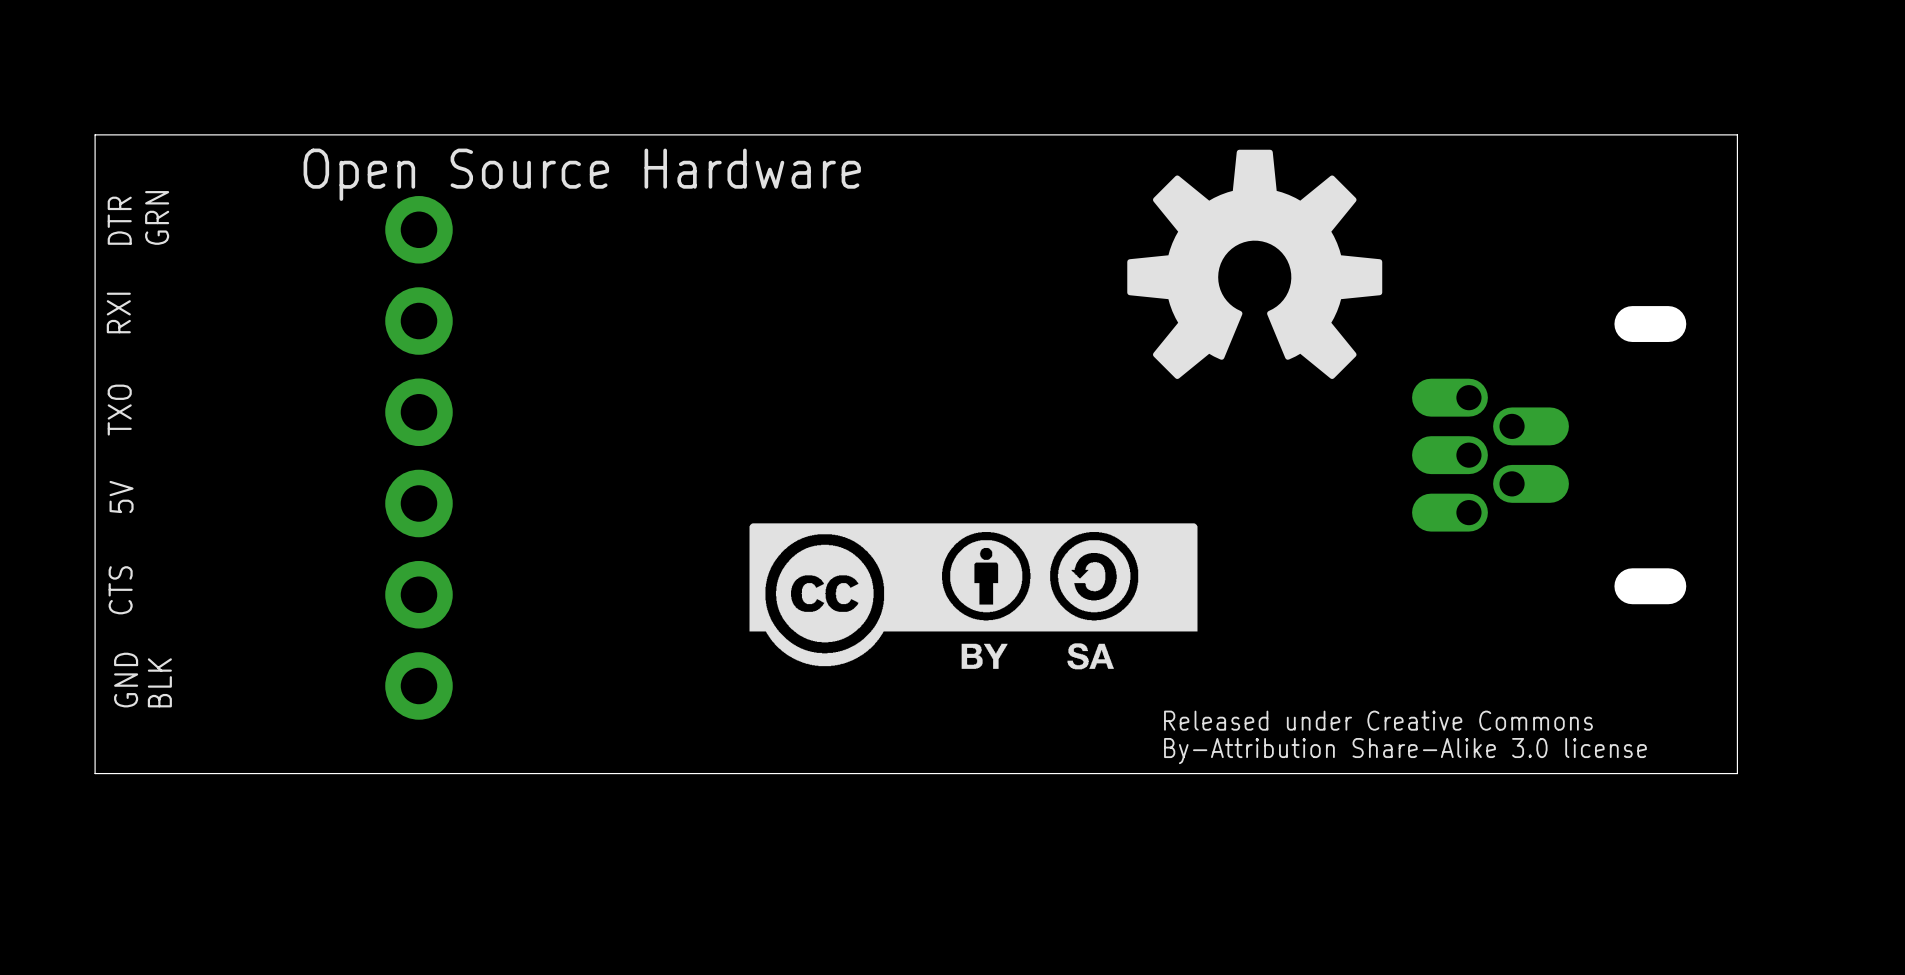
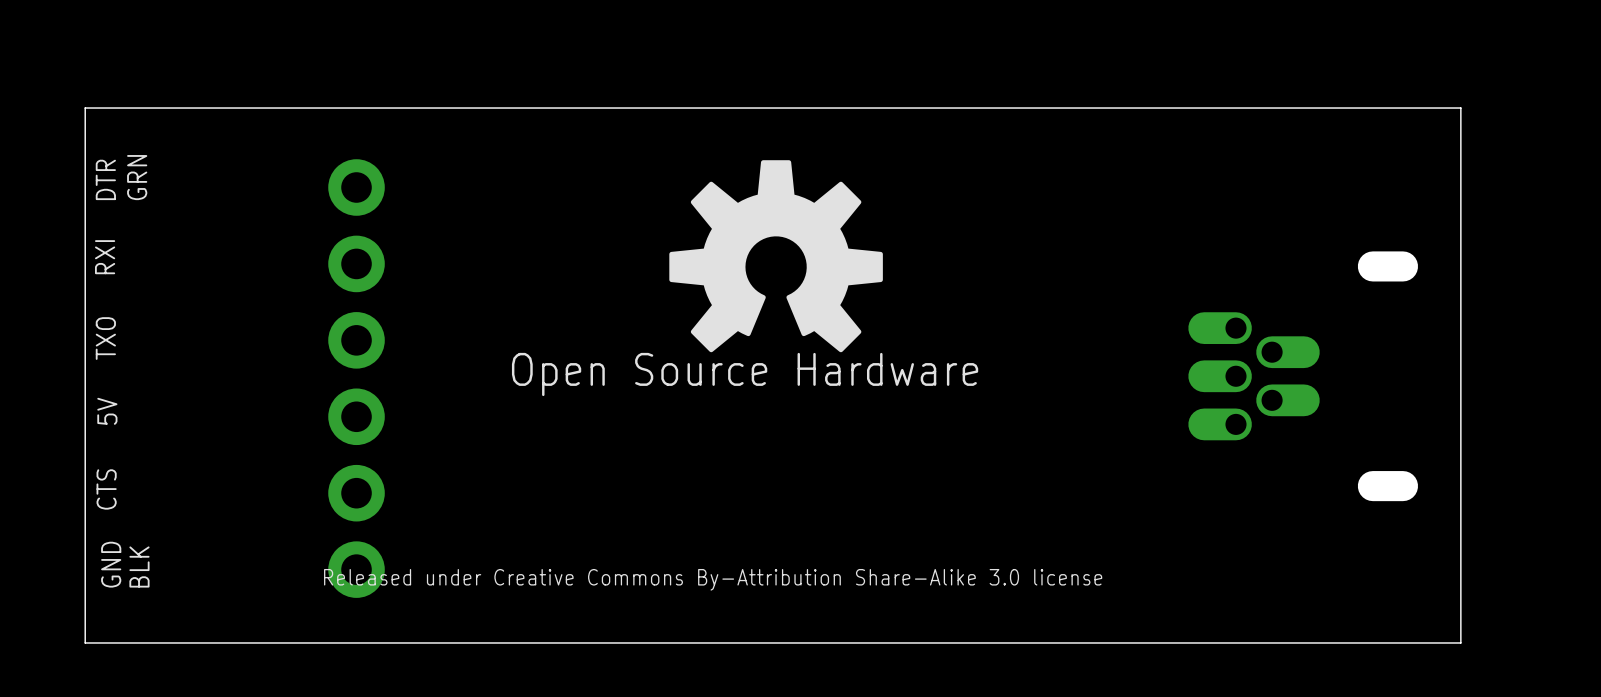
text position: Open Source Hardware (582, 174) -> Open Source Hardware (745, 374)
drawing position: (1254, 264) -> (776, 256)
drawing: [749, 523, 1198, 670] -> none
text: Released under Creative Commons (1378, 720) -> Released under Creative Commons By-Attribution Share-Alike 3.0 license (713, 579)
text: By-Attribution Share-Alike 3.0 license (1405, 751) -> none

